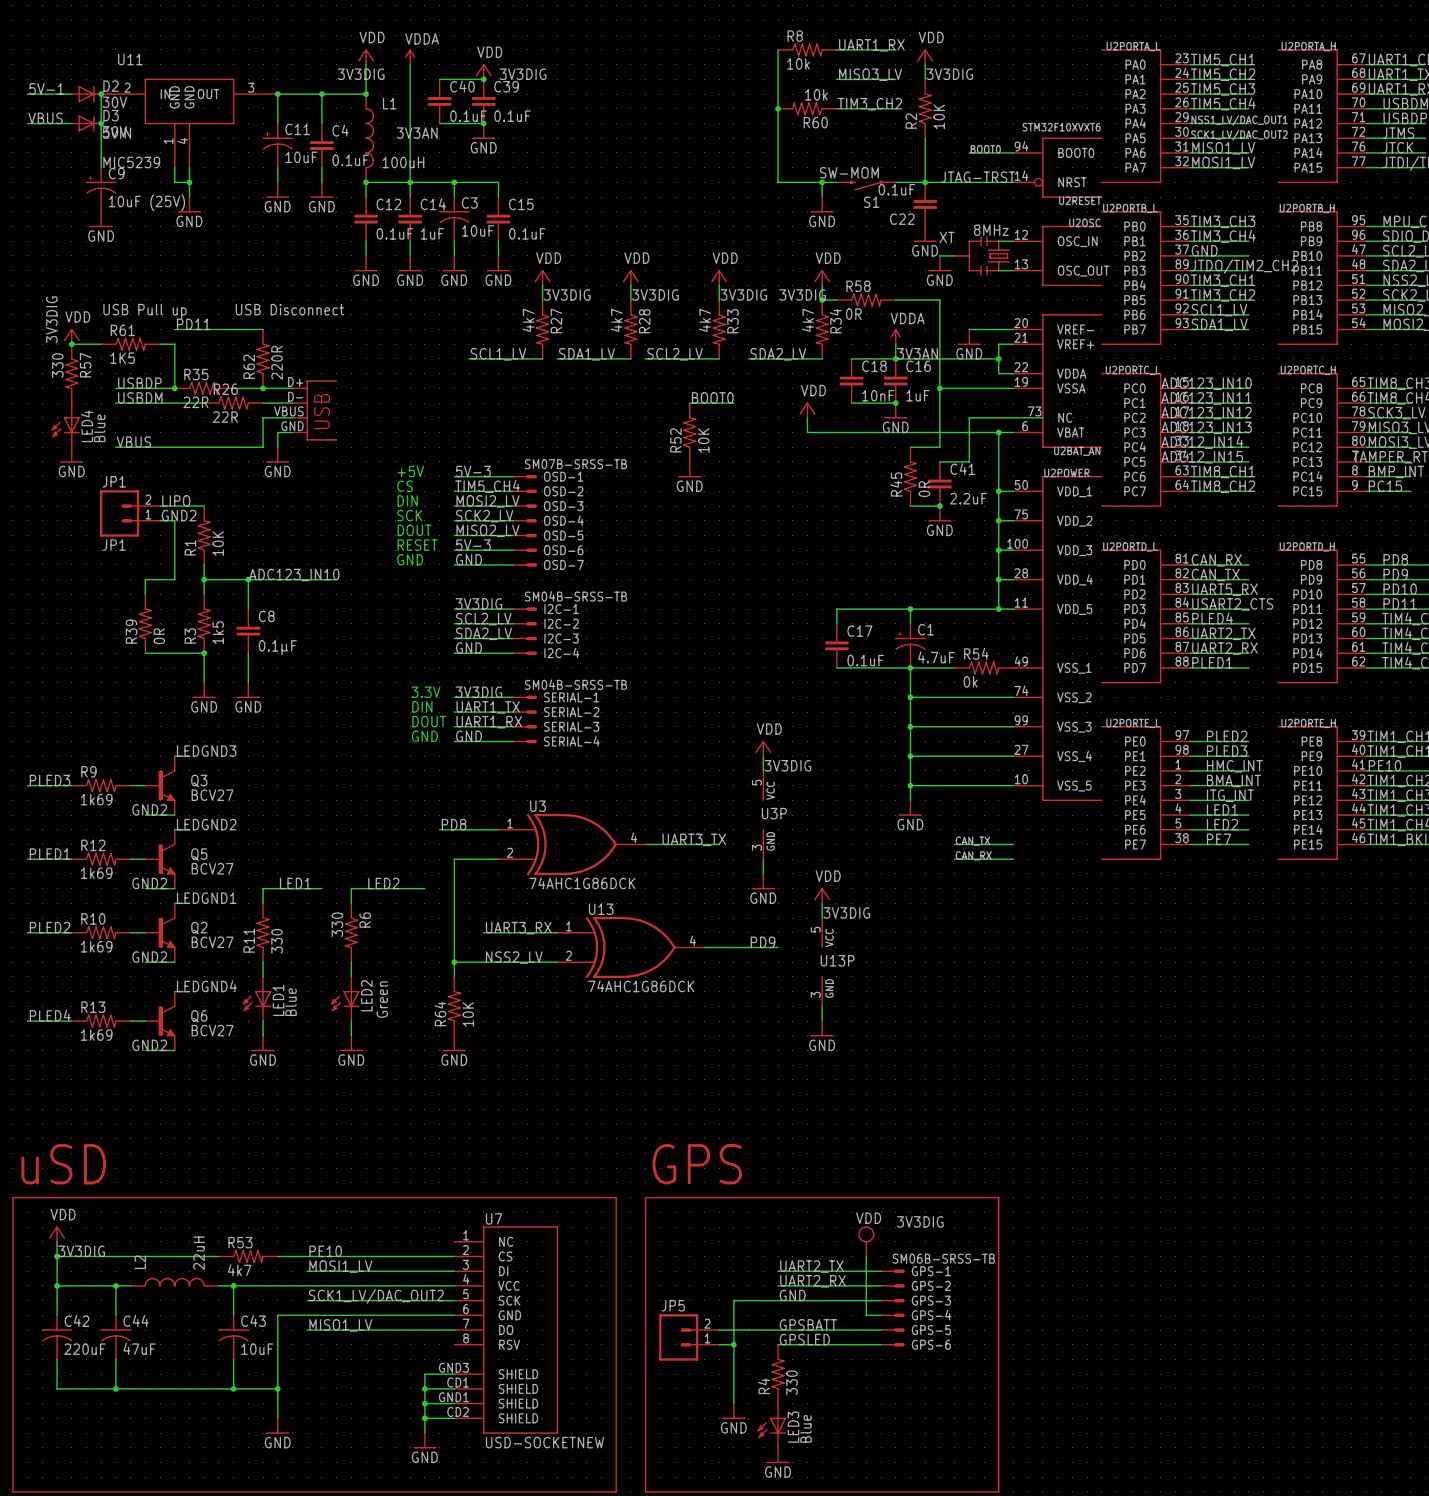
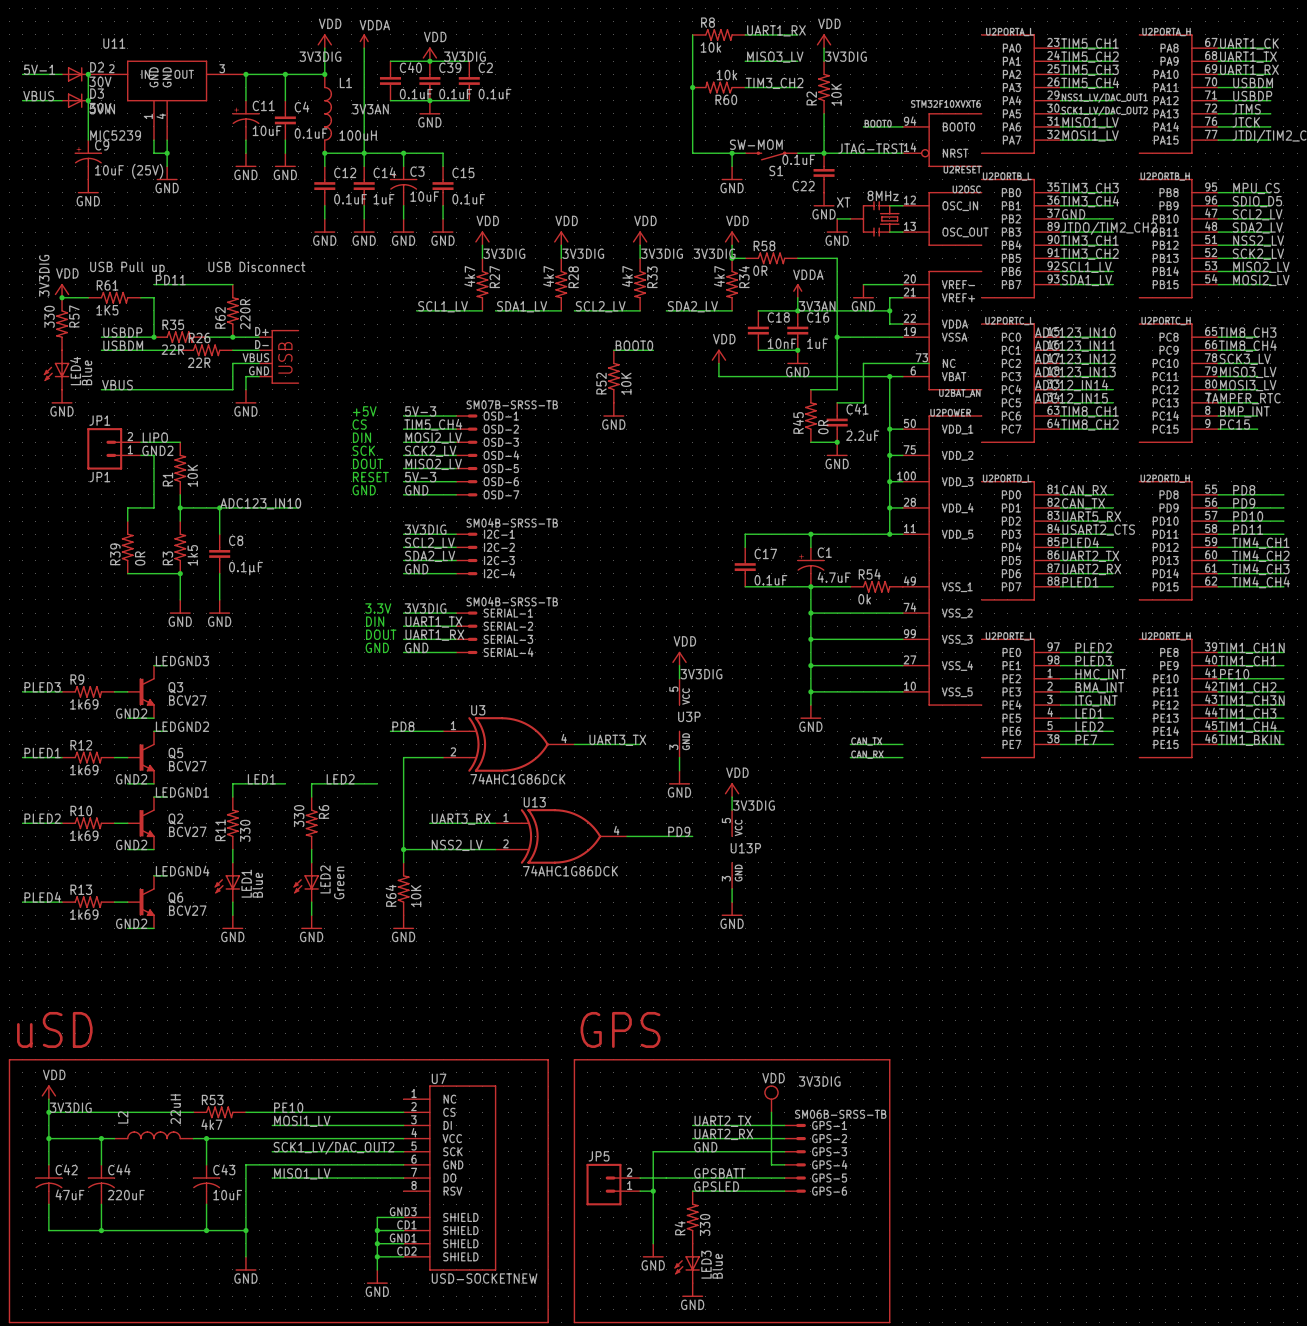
wire: none -> (429, 61) (469, 61)
C2: none -> 0.1uF (469, 80)
wire: none -> (429, 100) (469, 100)
C44 value: 47uF (139, 1348) -> 220uF (126, 1195)
C42 value: 220uF (84, 1349) -> 47uF (70, 1194)

